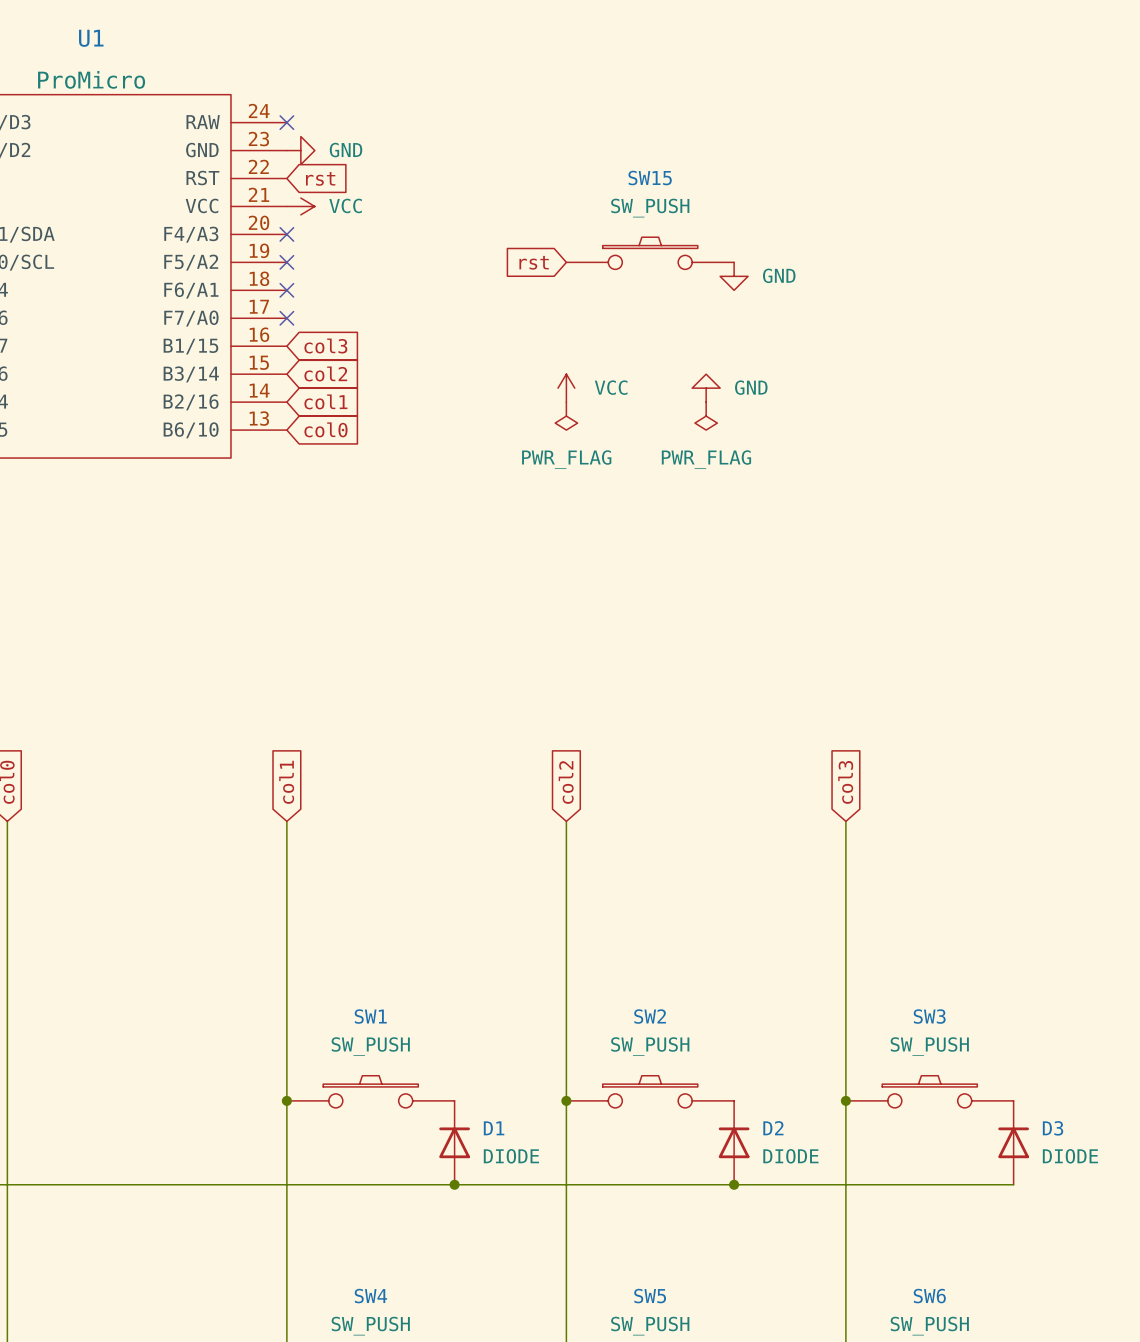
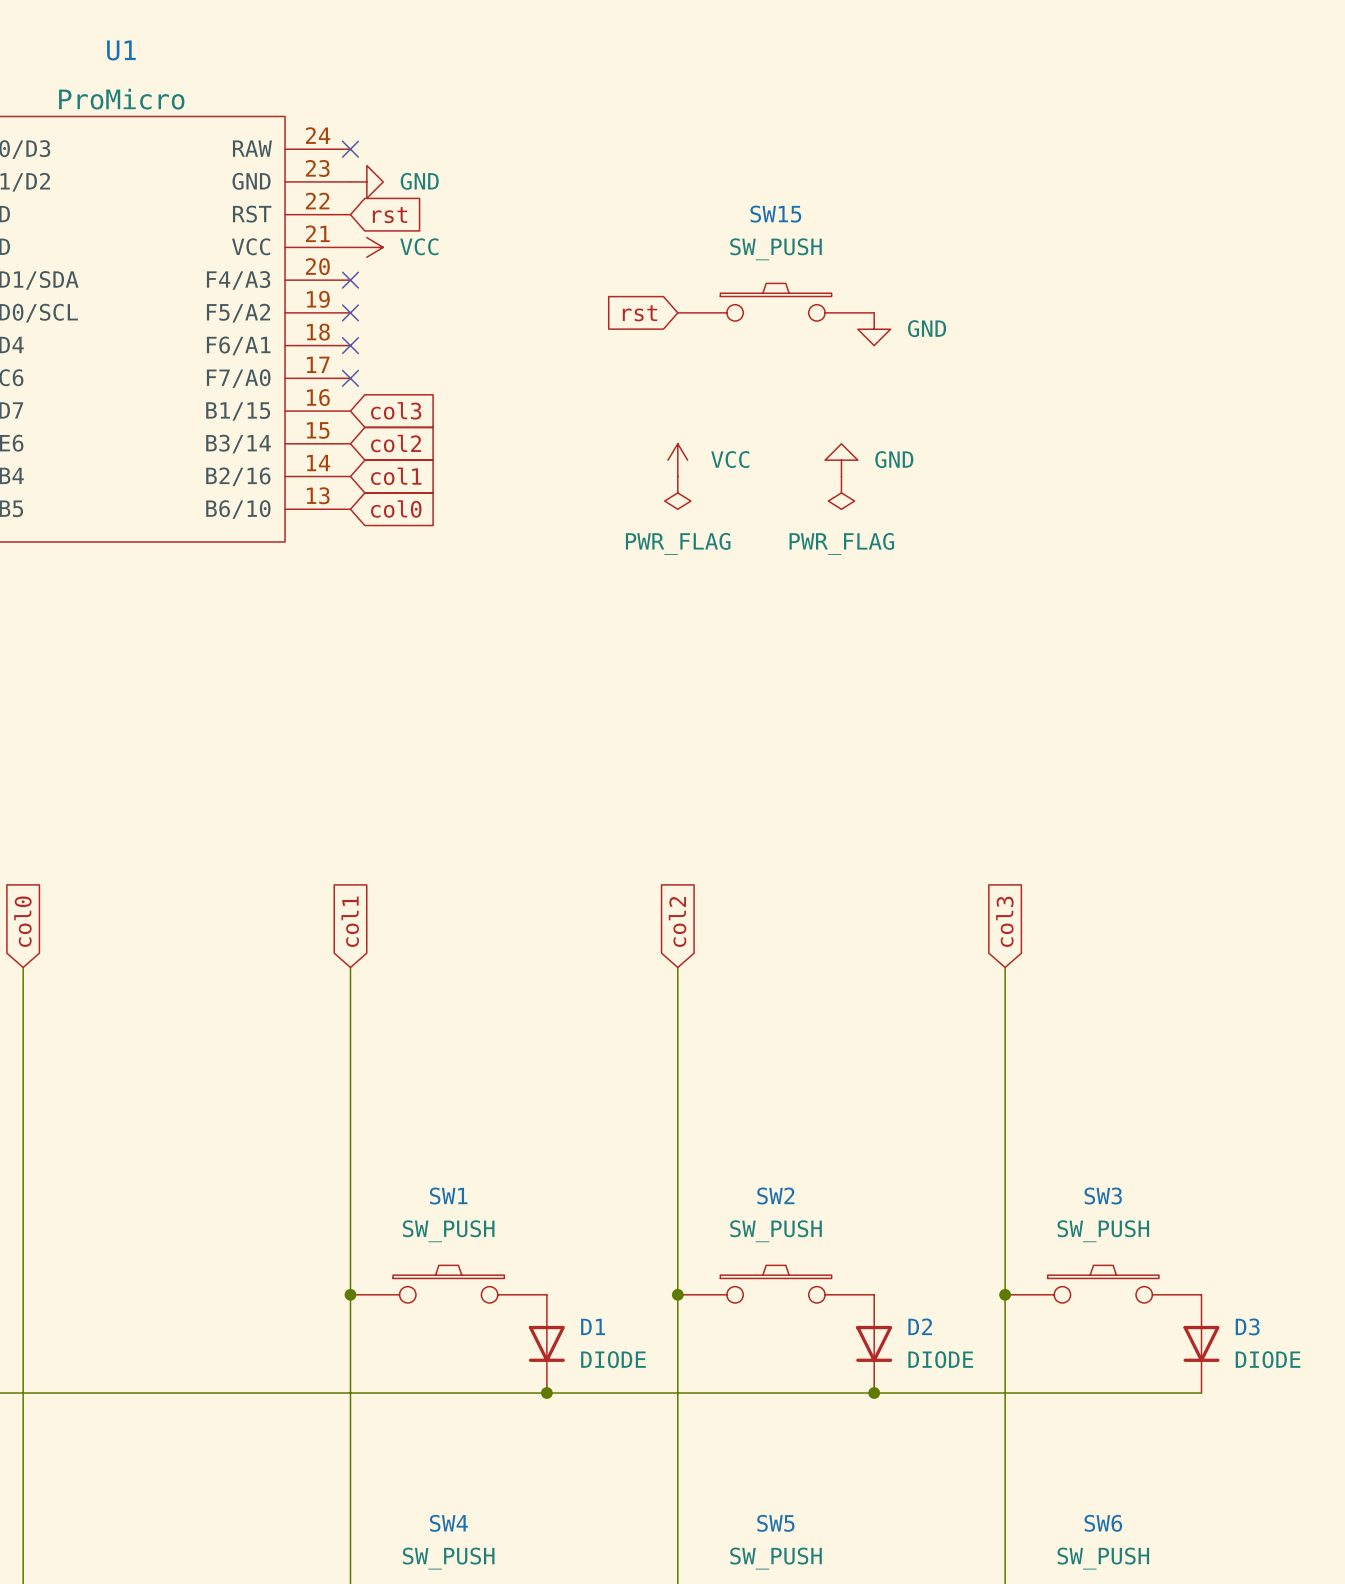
D1 rotation: 0° (454, 1142) -> 180° (546, 1343)
D2 rotation: 0° (734, 1142) -> 180° (874, 1343)
D3 rotation: 0° (1013, 1142) -> 180° (1201, 1343)

